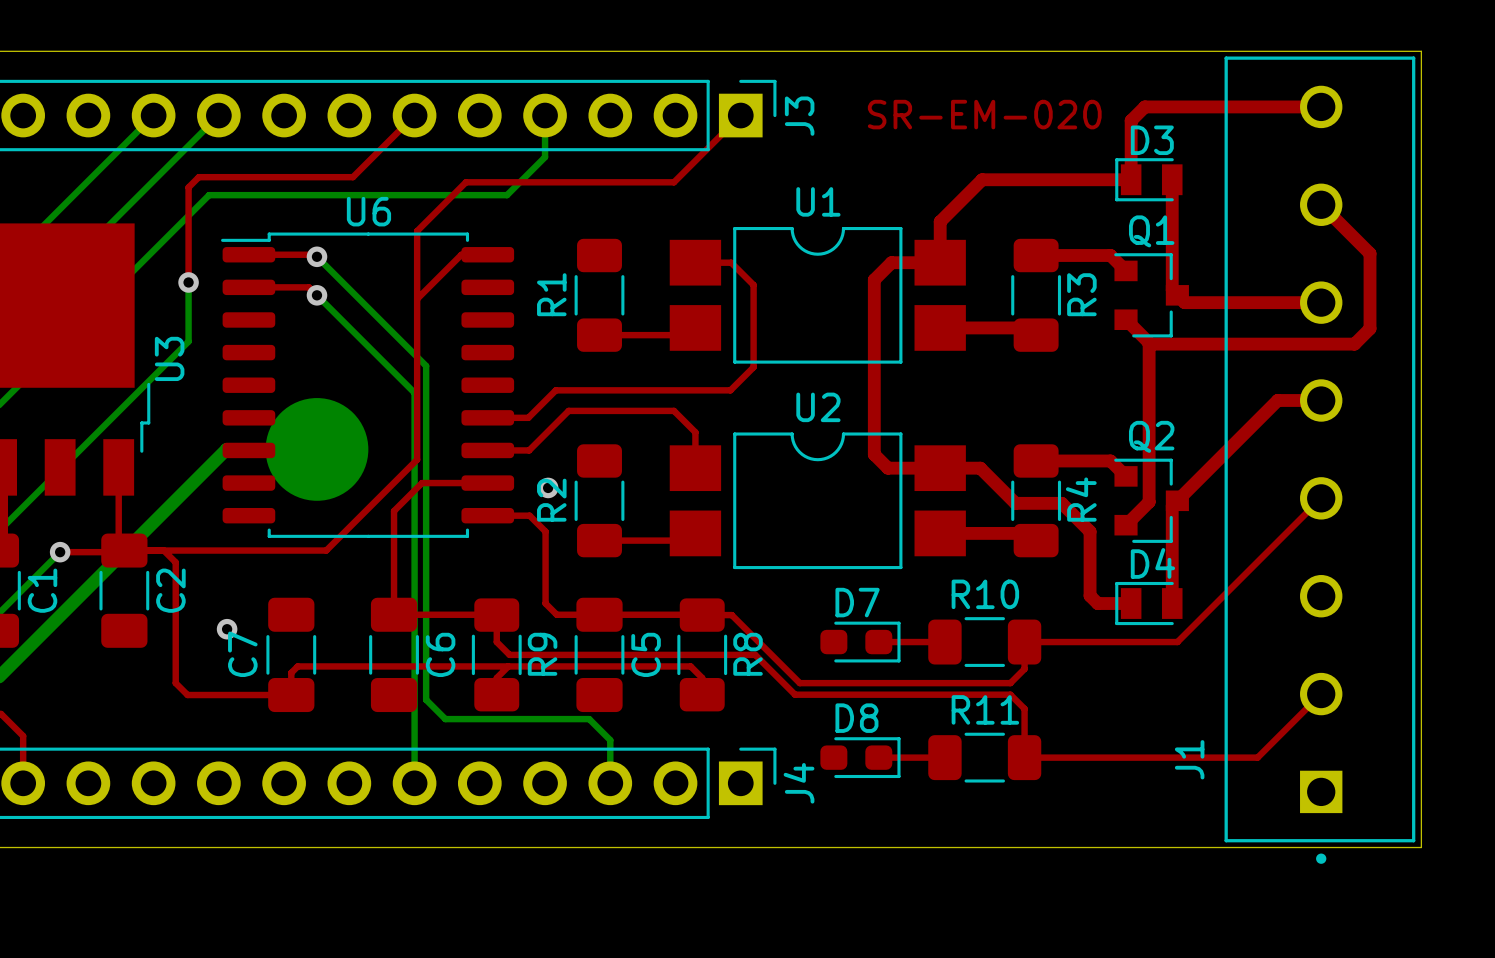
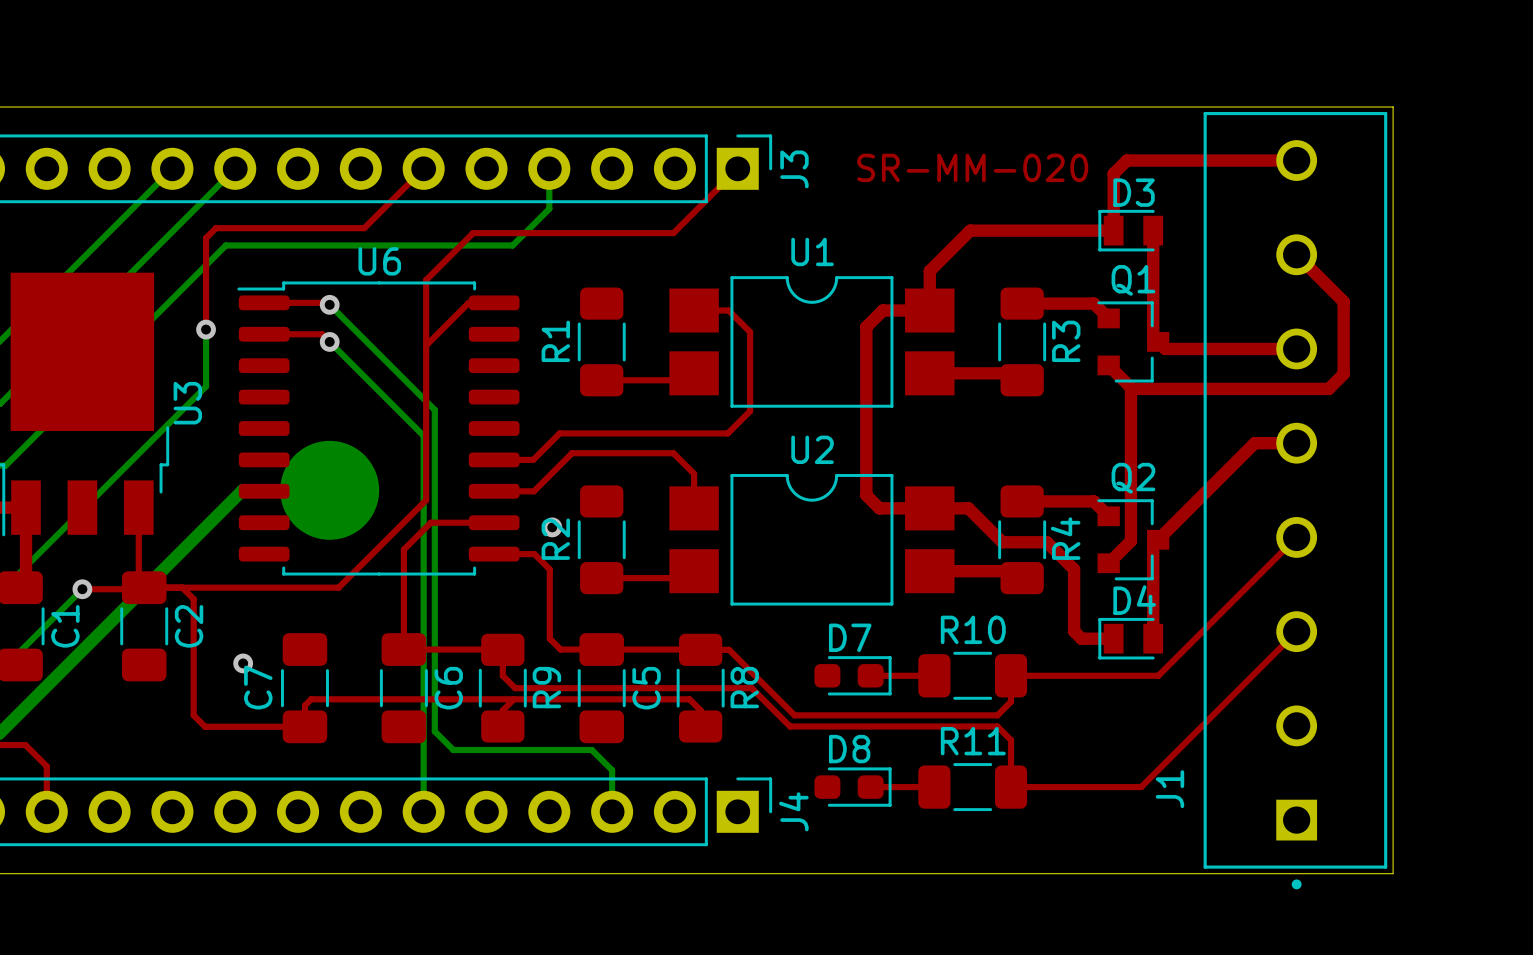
text: SR-EM-020 (984, 114) -> SR-MM-020 (972, 167)
top track: (1321, 694) (1257, 757) (1159, 757) -> (1296, 631) (1141, 787)

